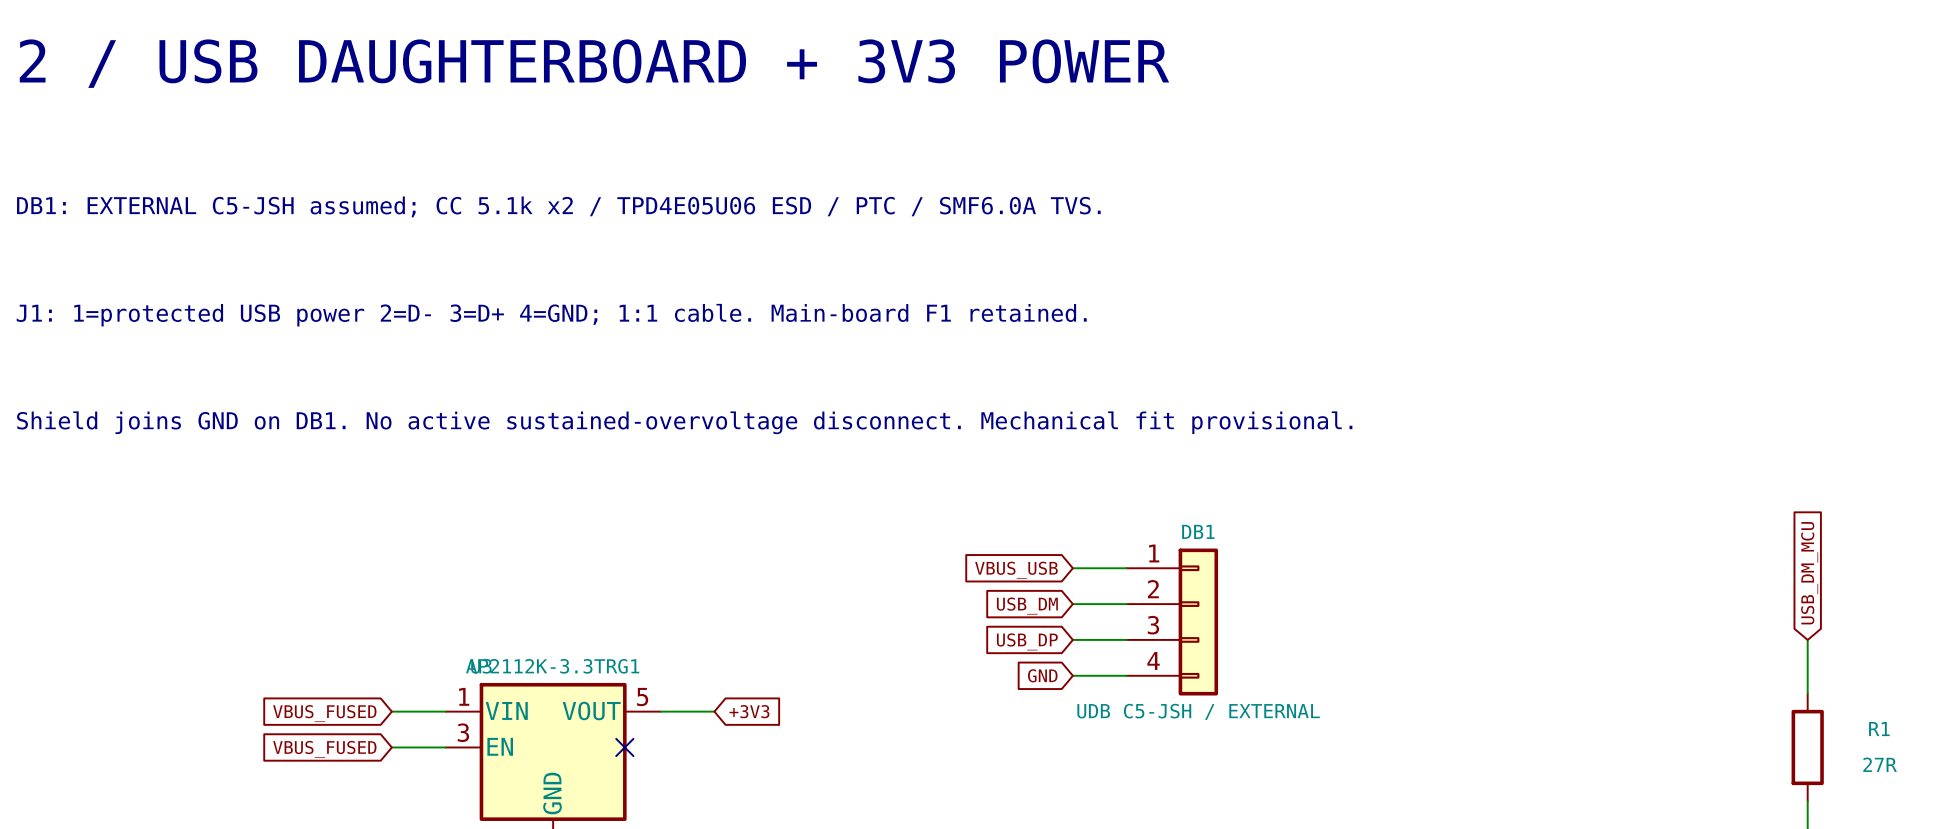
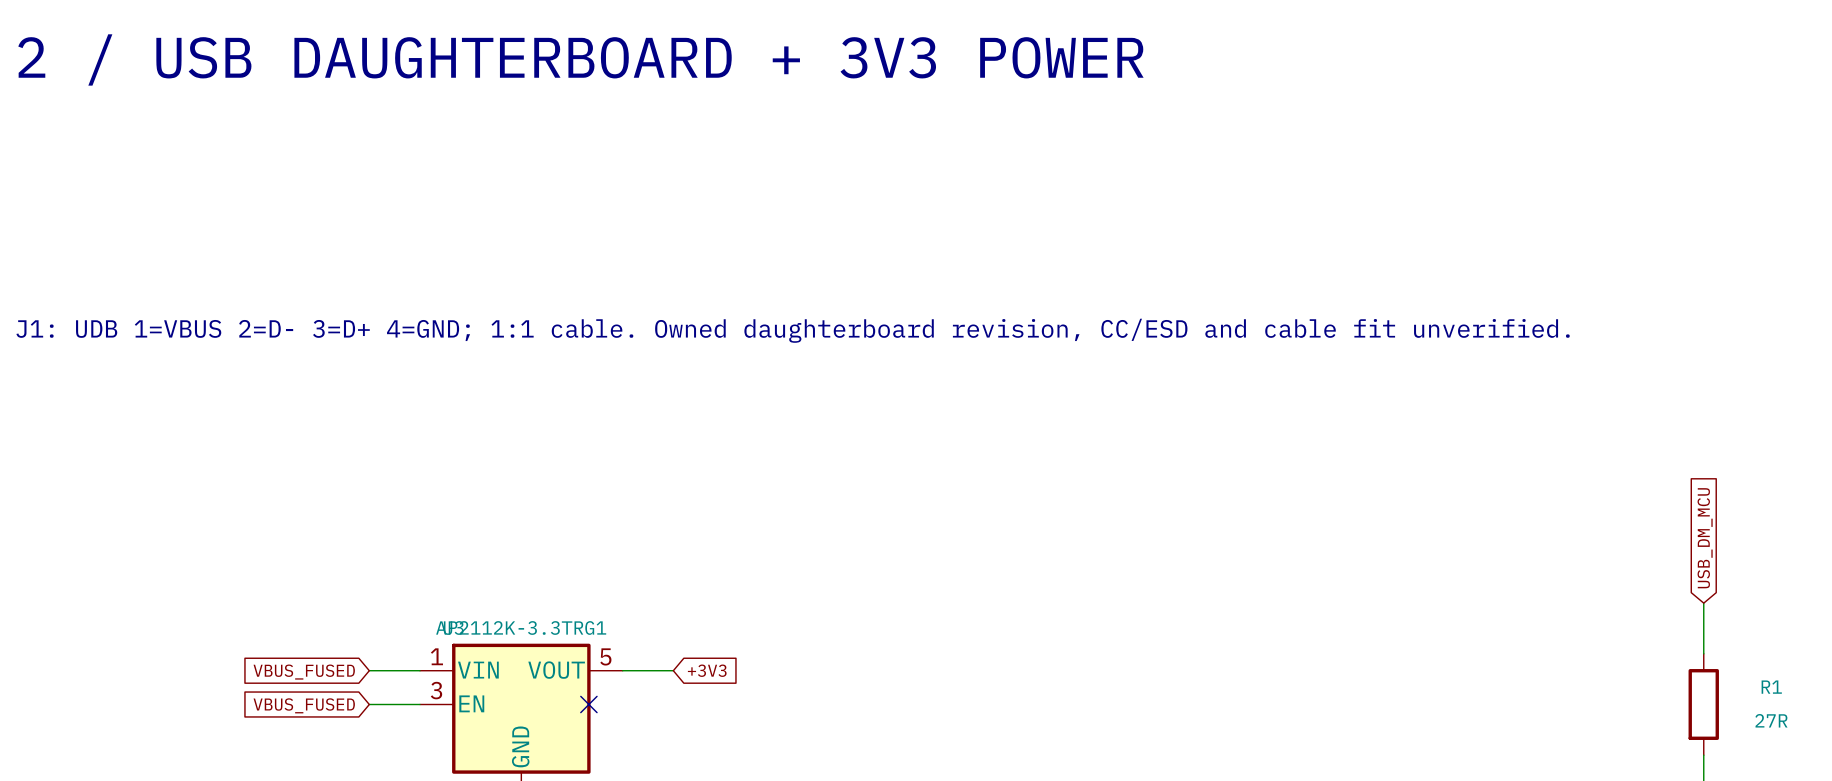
text: DB1: EXTERNAL C5-JSH assumed; CC 5.1k x2 / TPD4E05U06 ESD / PTC / SMF6.0A TVS. (558, 206) -> none
text: J1: 1=protected USB power 2=D- 3=D+ 4=GND; 1:1 cable. Main-board F1 retained. (551, 315) -> none
text: none -> J1: UDB 1=VBUS 2=D- 3=D+ 4=GND; 1:1 cable. Owned daughterboard revision, CC/ESD and cable fit unverified. (793, 330)
text: Shield joins GND on DB1. No active sustained-overvoltage disconnect. Mechanical fit provisional. (684, 422) -> none
wire: (1072, 568) (1126, 568) -> none
global label: VBUS_USB (1016, 570) -> none
wire: (1072, 604) (1126, 604) -> none
global label: USB_DM (1027, 606) -> none
DB1: UDB C5-JSH / EXTERNAL (1172, 622) -> none
wire: (1072, 639) (1126, 639) -> none
global label: USB_DP (1027, 641) -> none
global label: GND (1042, 675) -> none
wire: (1072, 675) (1126, 675) -> none

